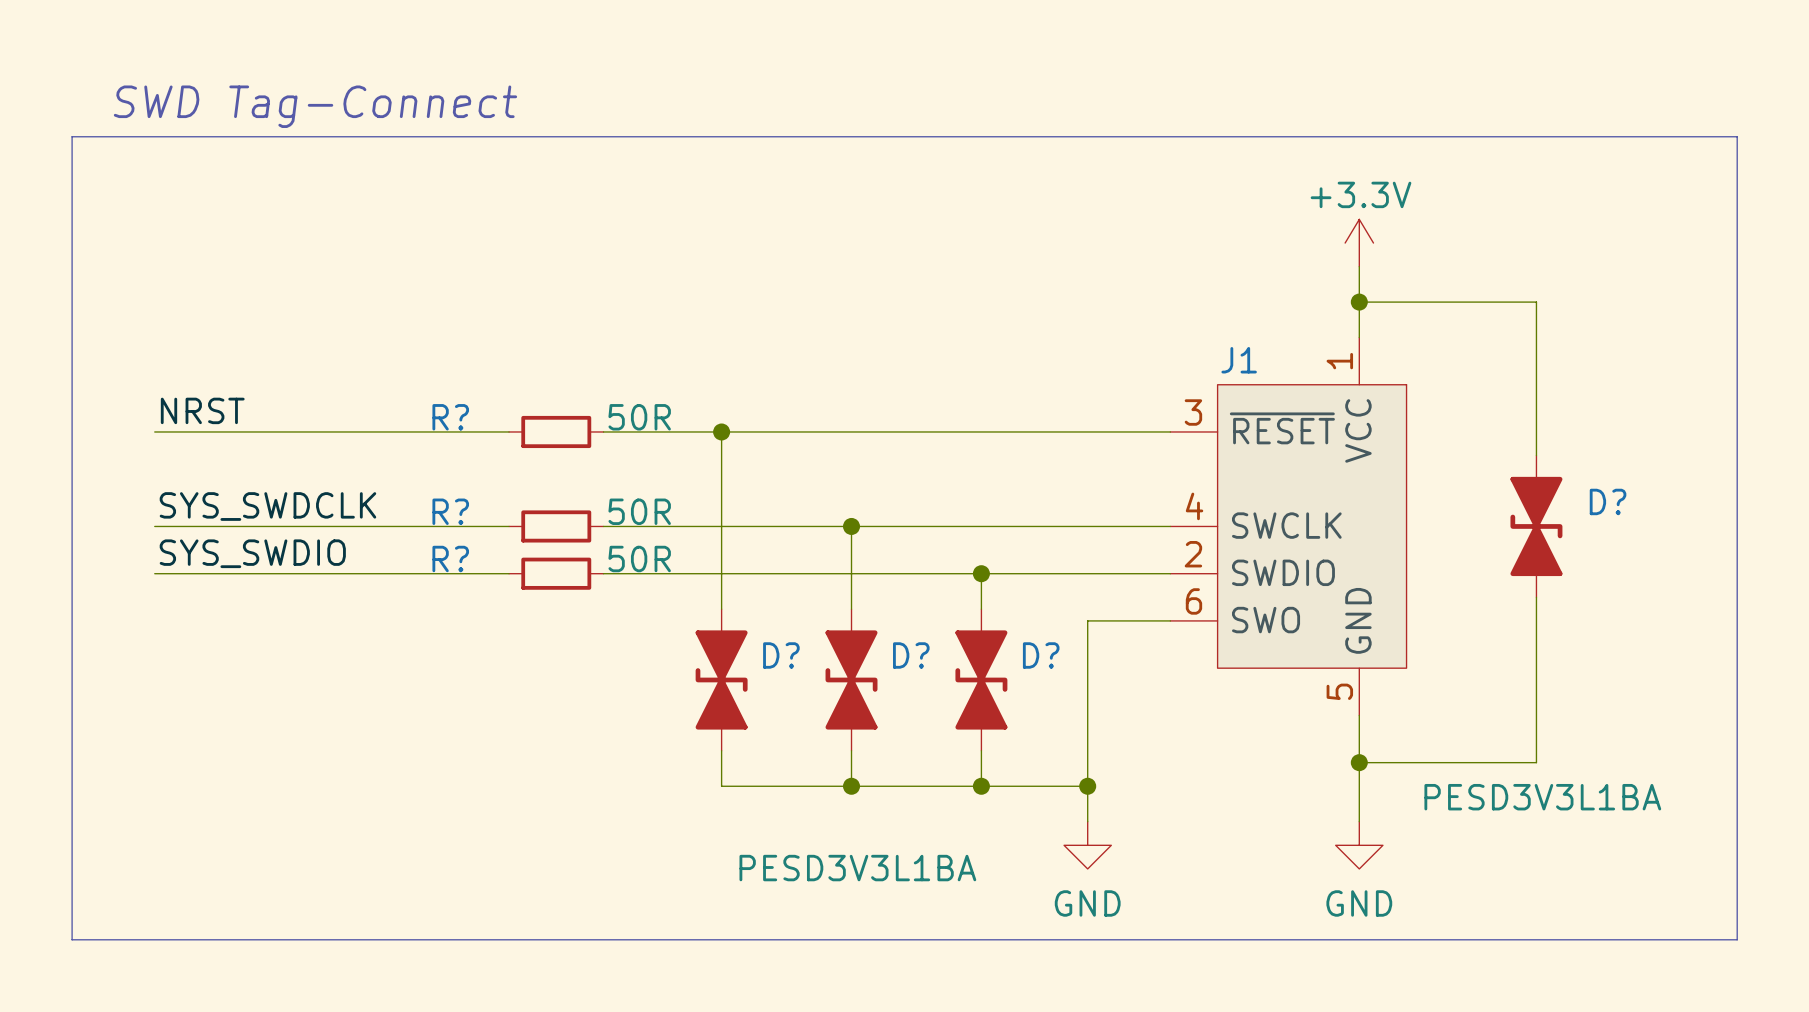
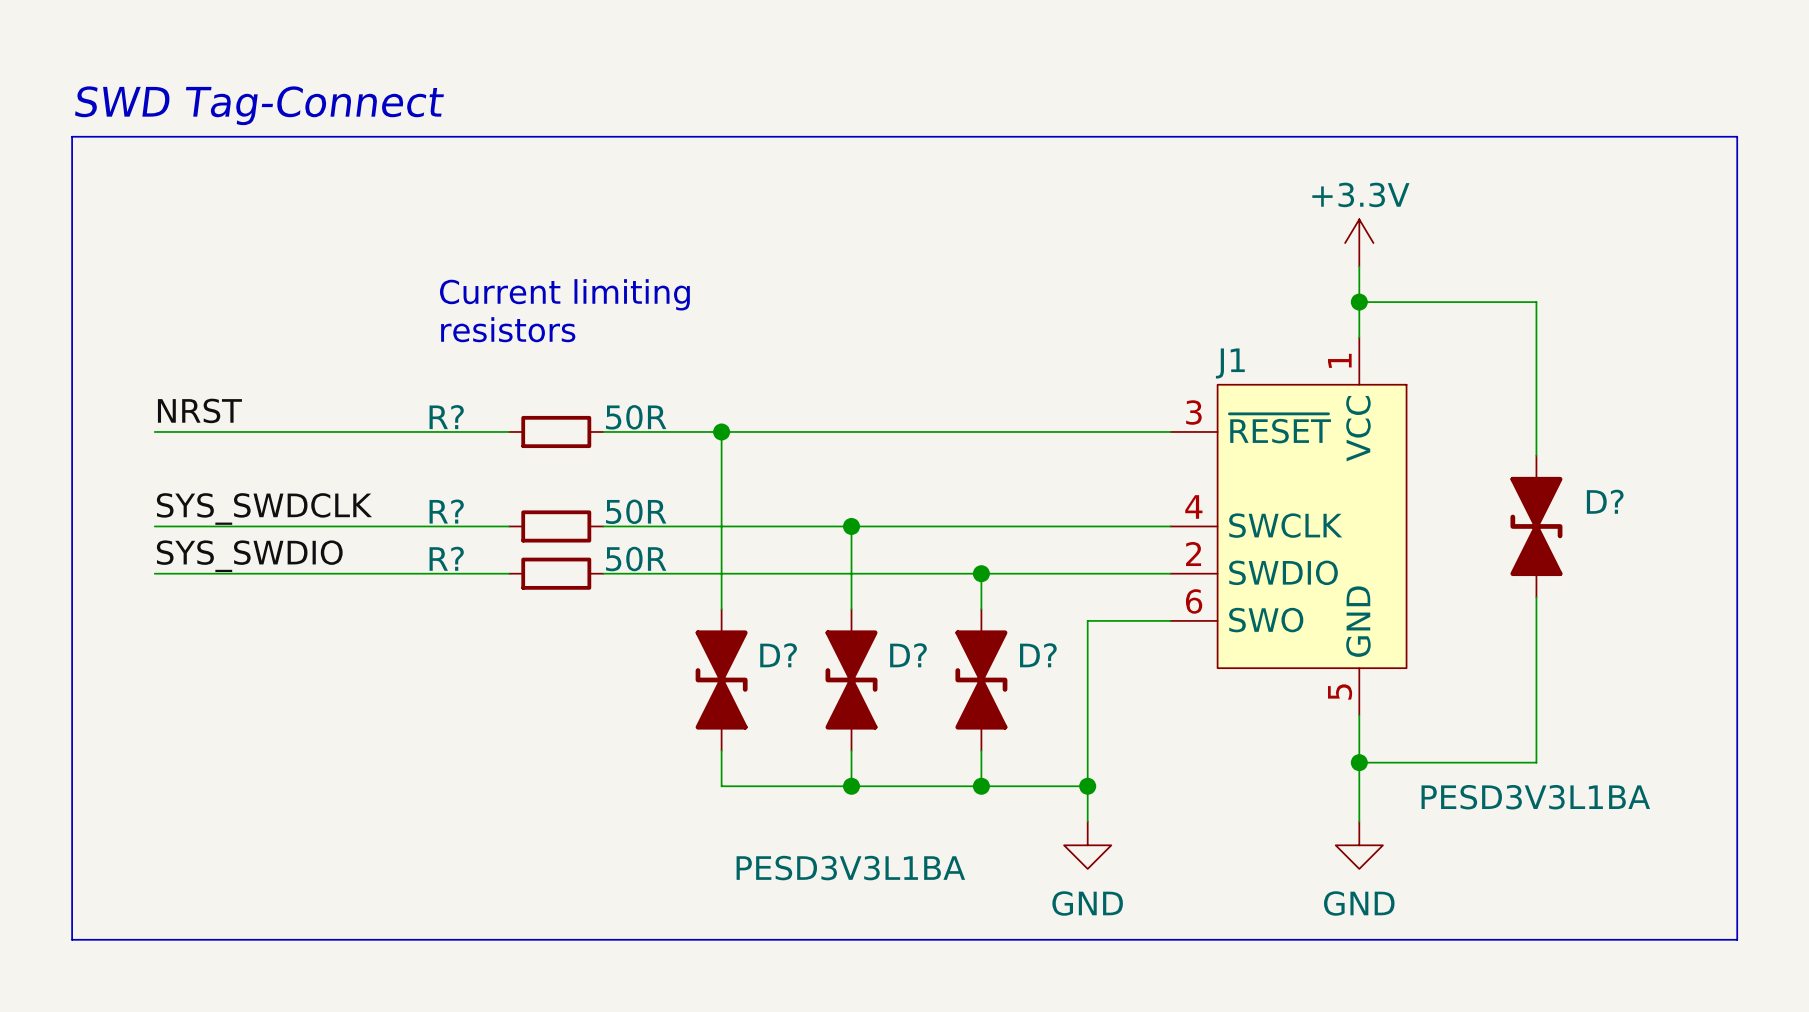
text position: SWD Tag-Connect (315, 106) -> SWD Tag-Connect (259, 105)
text: none -> Current limiting (564, 294)
text: none -> resistors (508, 329)

